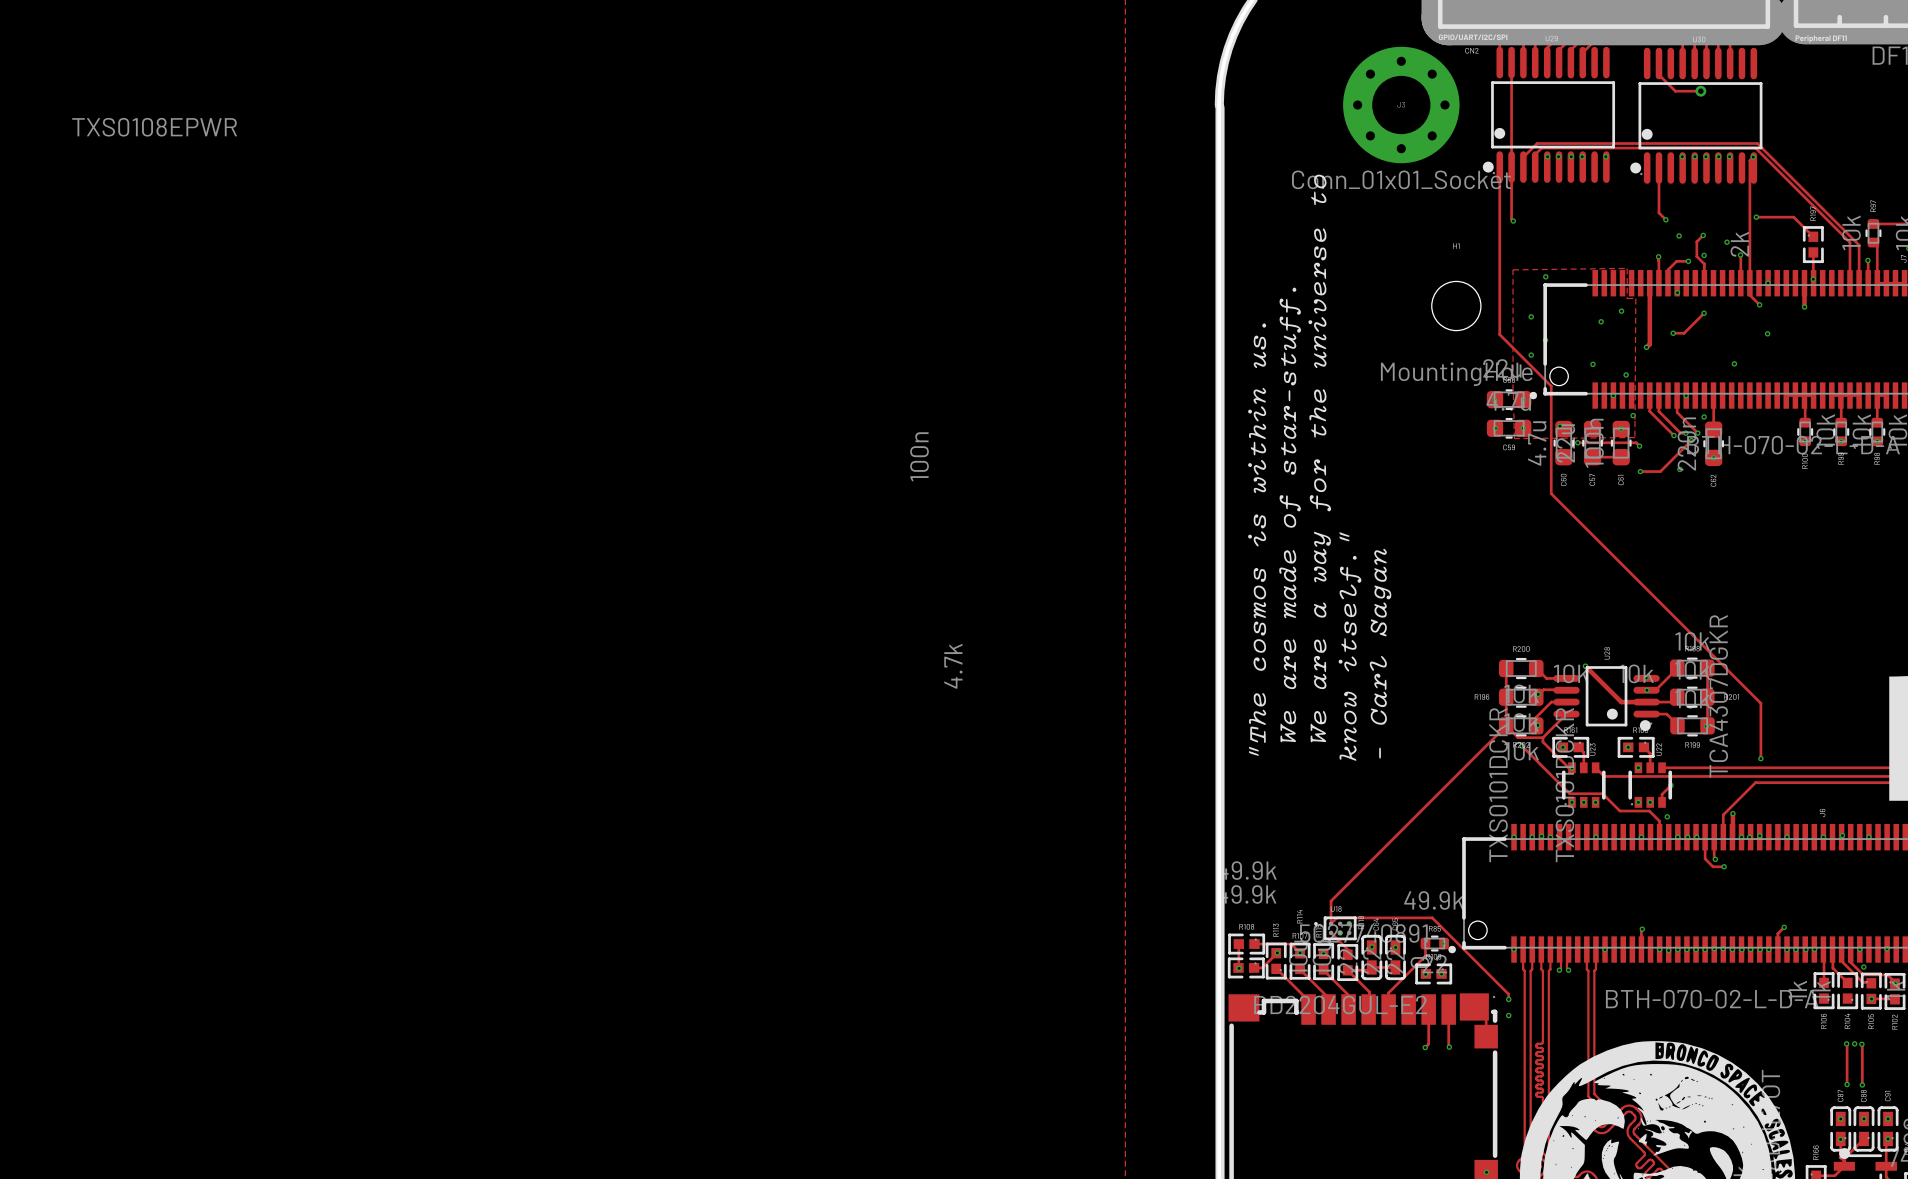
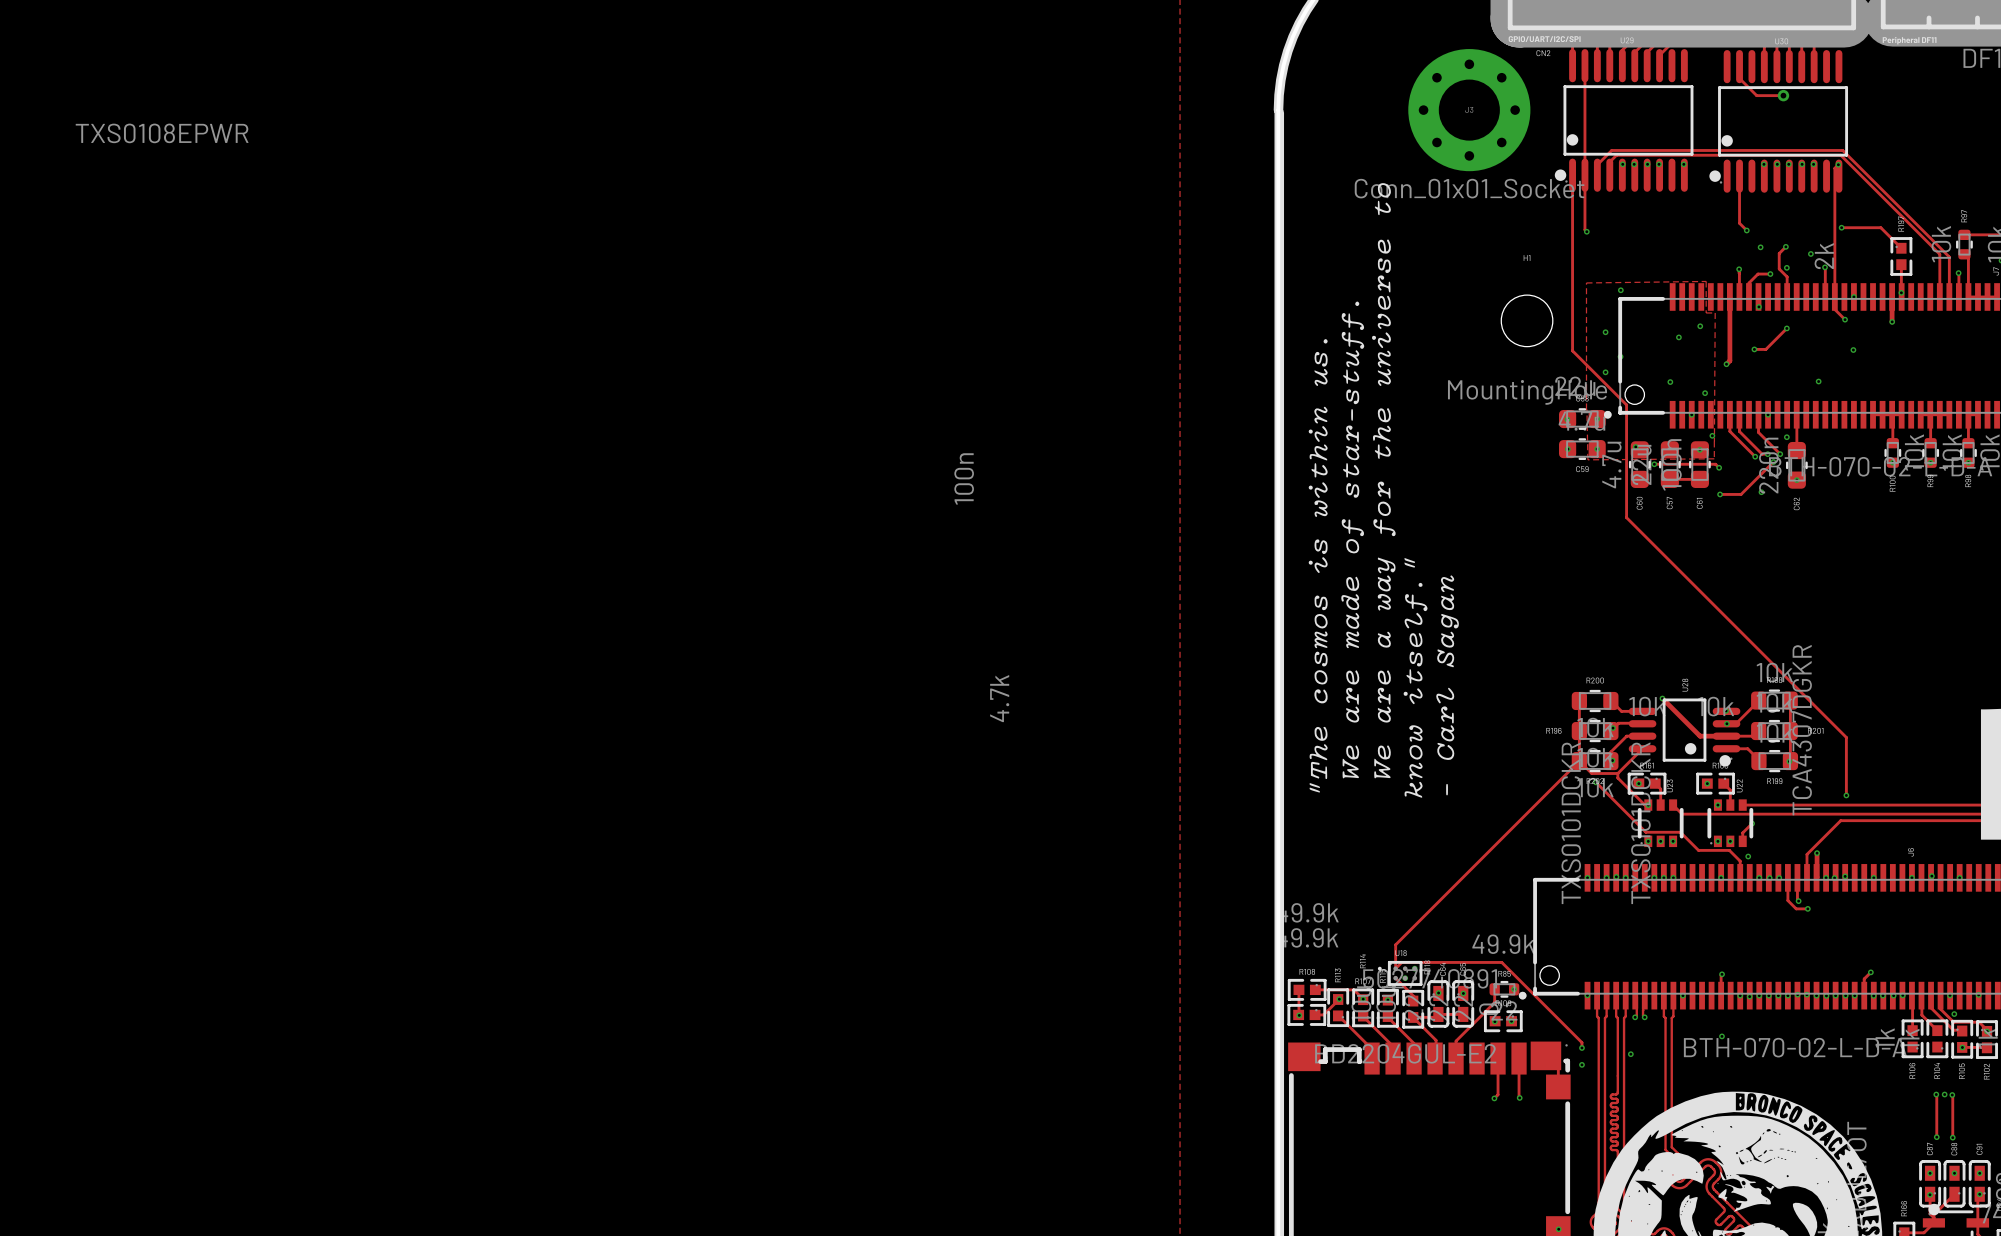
via: none -> (1654, 877)
via: none -> (1663, 877)
via: none -> (1721, 1036)
via: none -> (1630, 1054)

